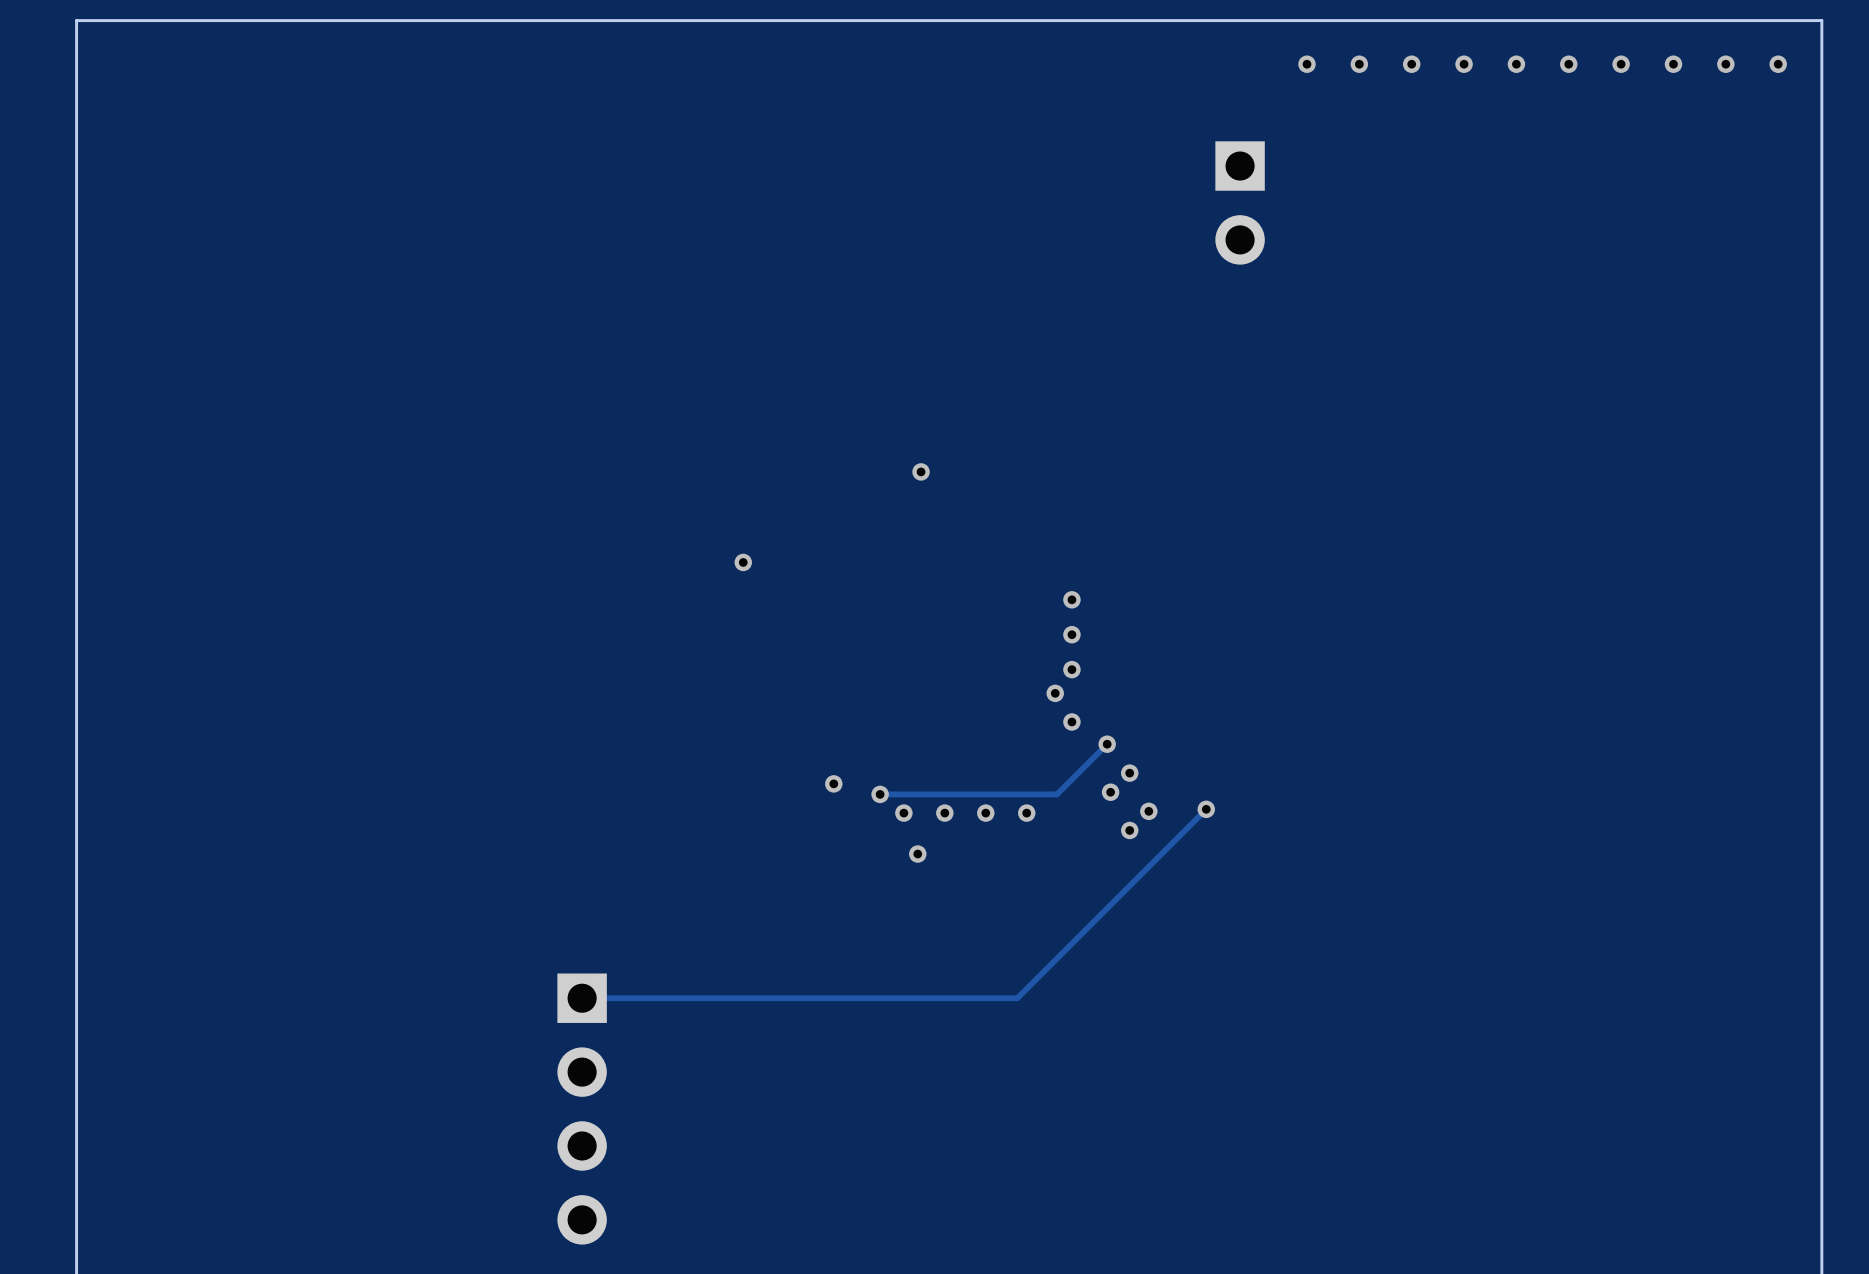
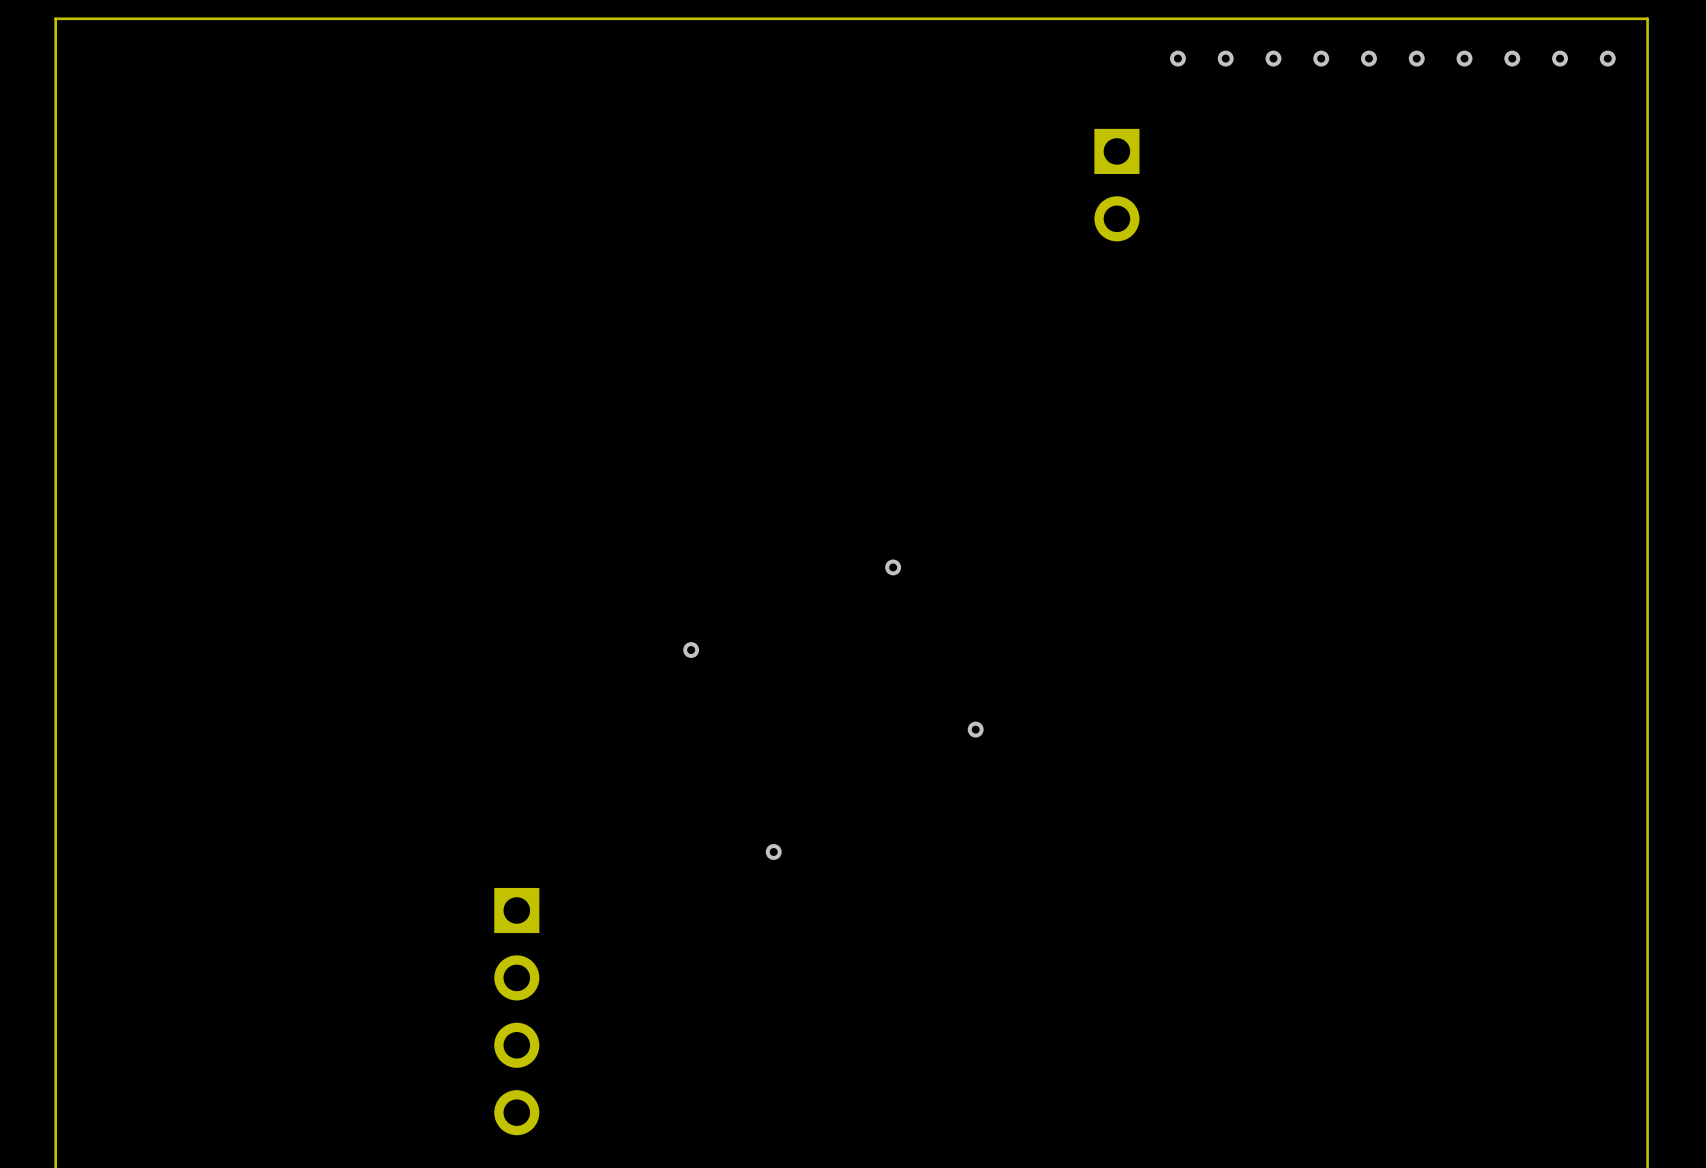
via: (921, 471) -> none
via: (743, 562) -> none
via: (1071, 599) -> none
via: none -> (893, 567)
via: (1071, 634) -> none
via: (1071, 669) -> none
via: (1055, 693) -> none
via: none -> (691, 650)
via: (1071, 721) -> none
track: (1107, 744) (1056, 794) (880, 794) -> none
via: (1107, 744) -> none
via: (1129, 773) -> none
via: (833, 783) -> none
via: (1110, 792) -> none
via: (880, 794) -> none
via: none -> (975, 729)
track: (1206, 809) (1017, 998) (582, 998) -> none
via: (1206, 809) -> none
via: (1148, 811) -> none
via: (903, 813) -> none
via: (944, 813) -> none
via: (985, 813) -> none
via: (1026, 813) -> none
via: (1129, 830) -> none
via: (917, 854) -> none
via: none -> (773, 851)

